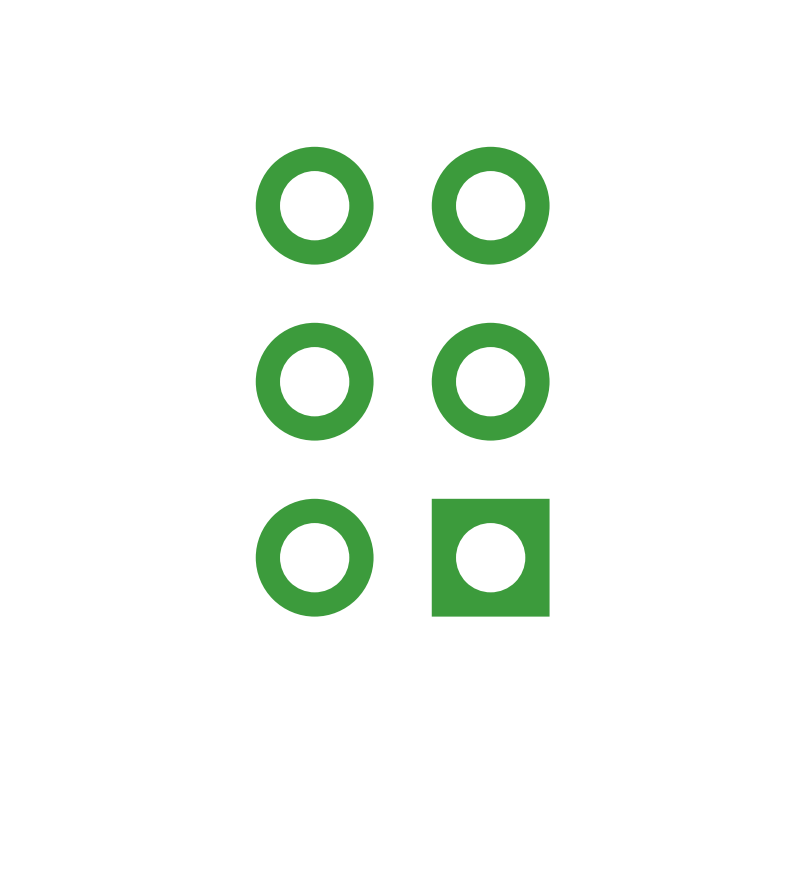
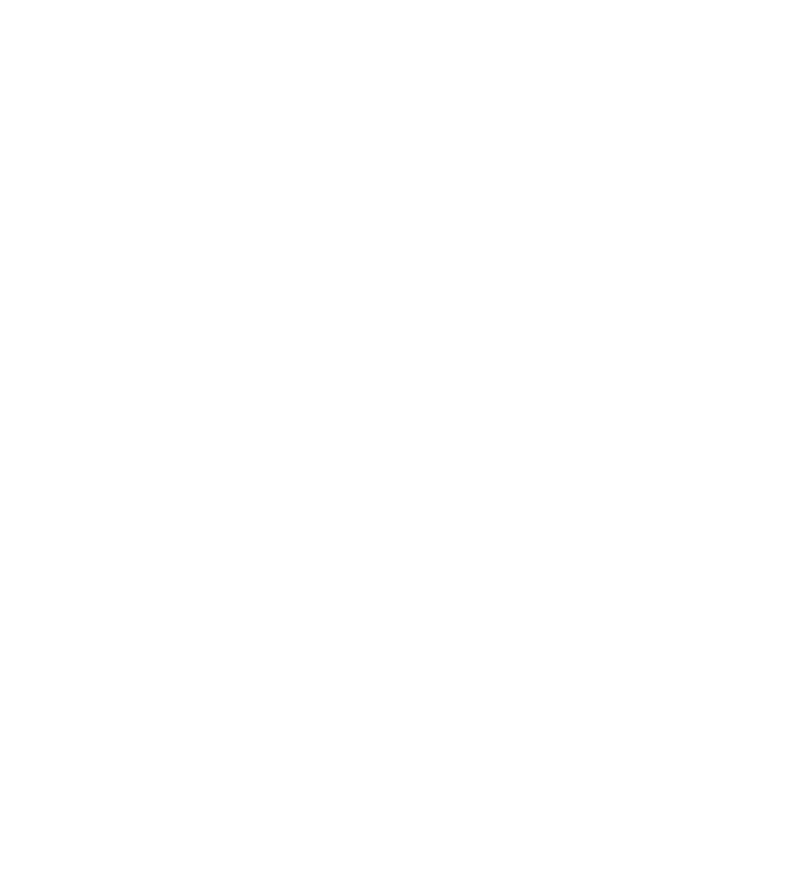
part: (402, 381) -> none

